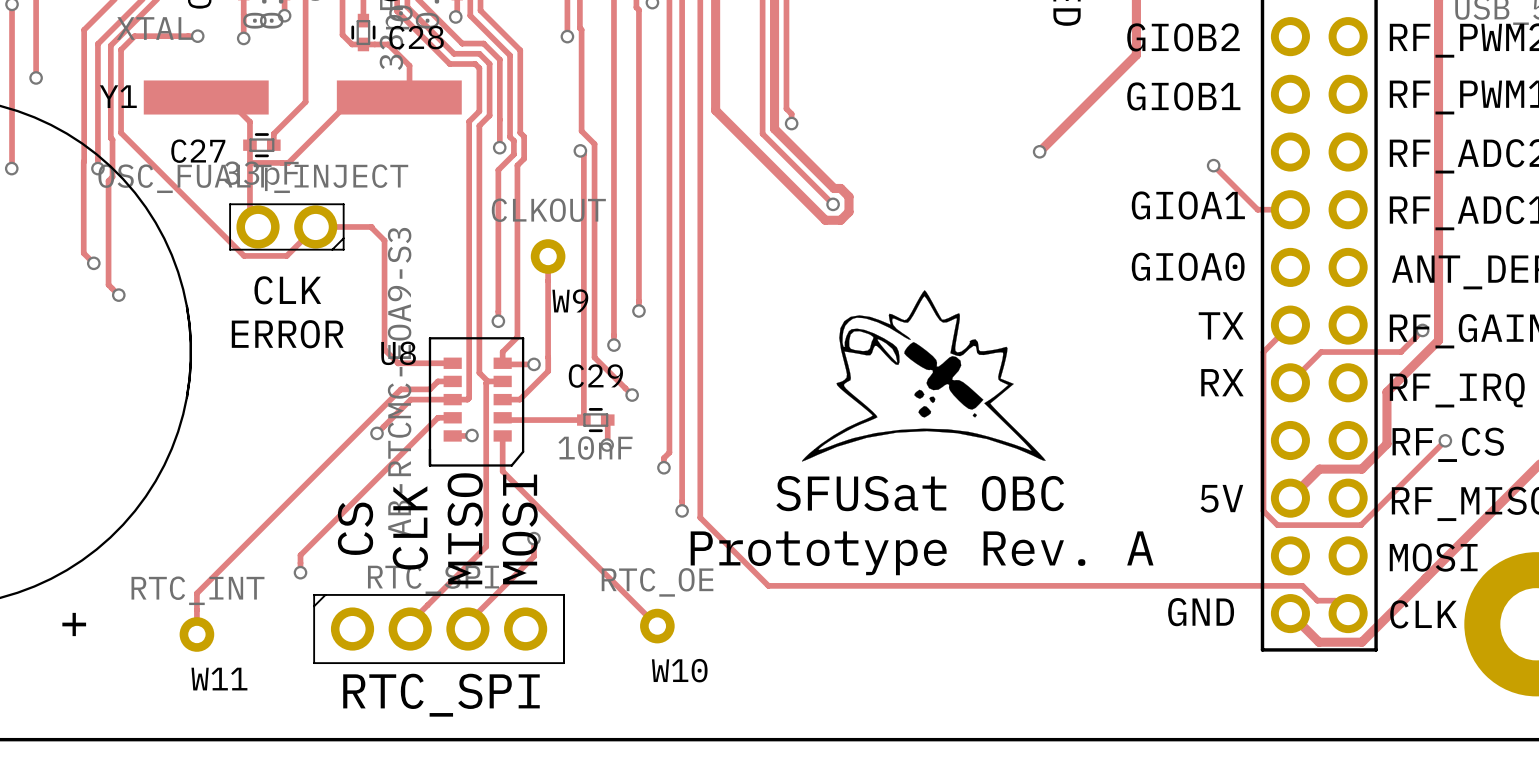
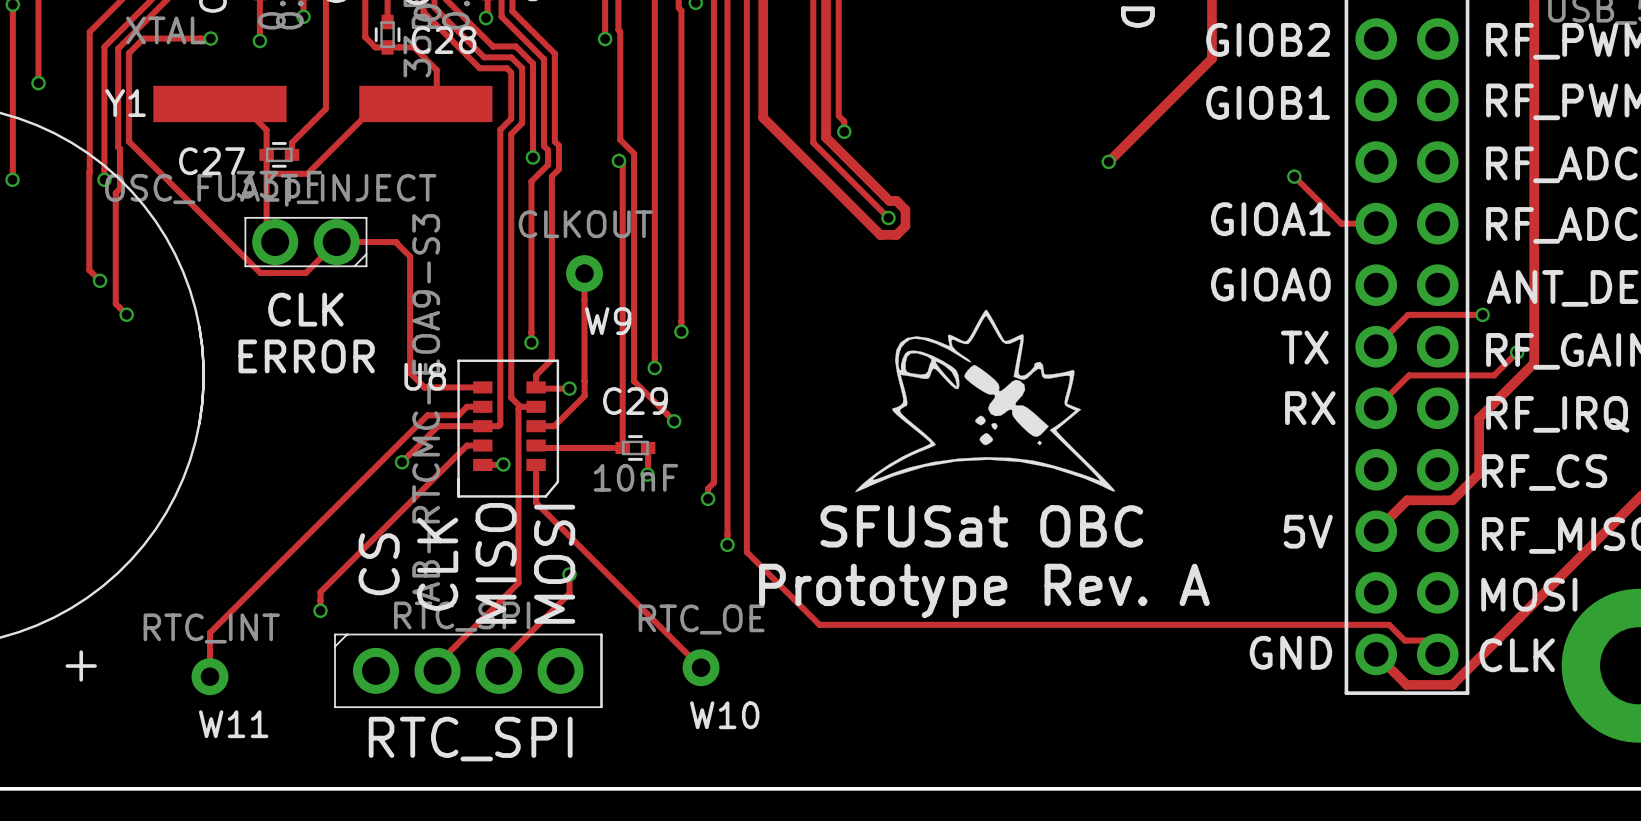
via: none -> (1482, 314)
track: (1290, 325) (1263, 352) (1263, 511) (1277, 525) (1361, 525) (1445, 440) -> (1376, 346) (1408, 314) (1482, 314)
via: (1445, 440) -> none

